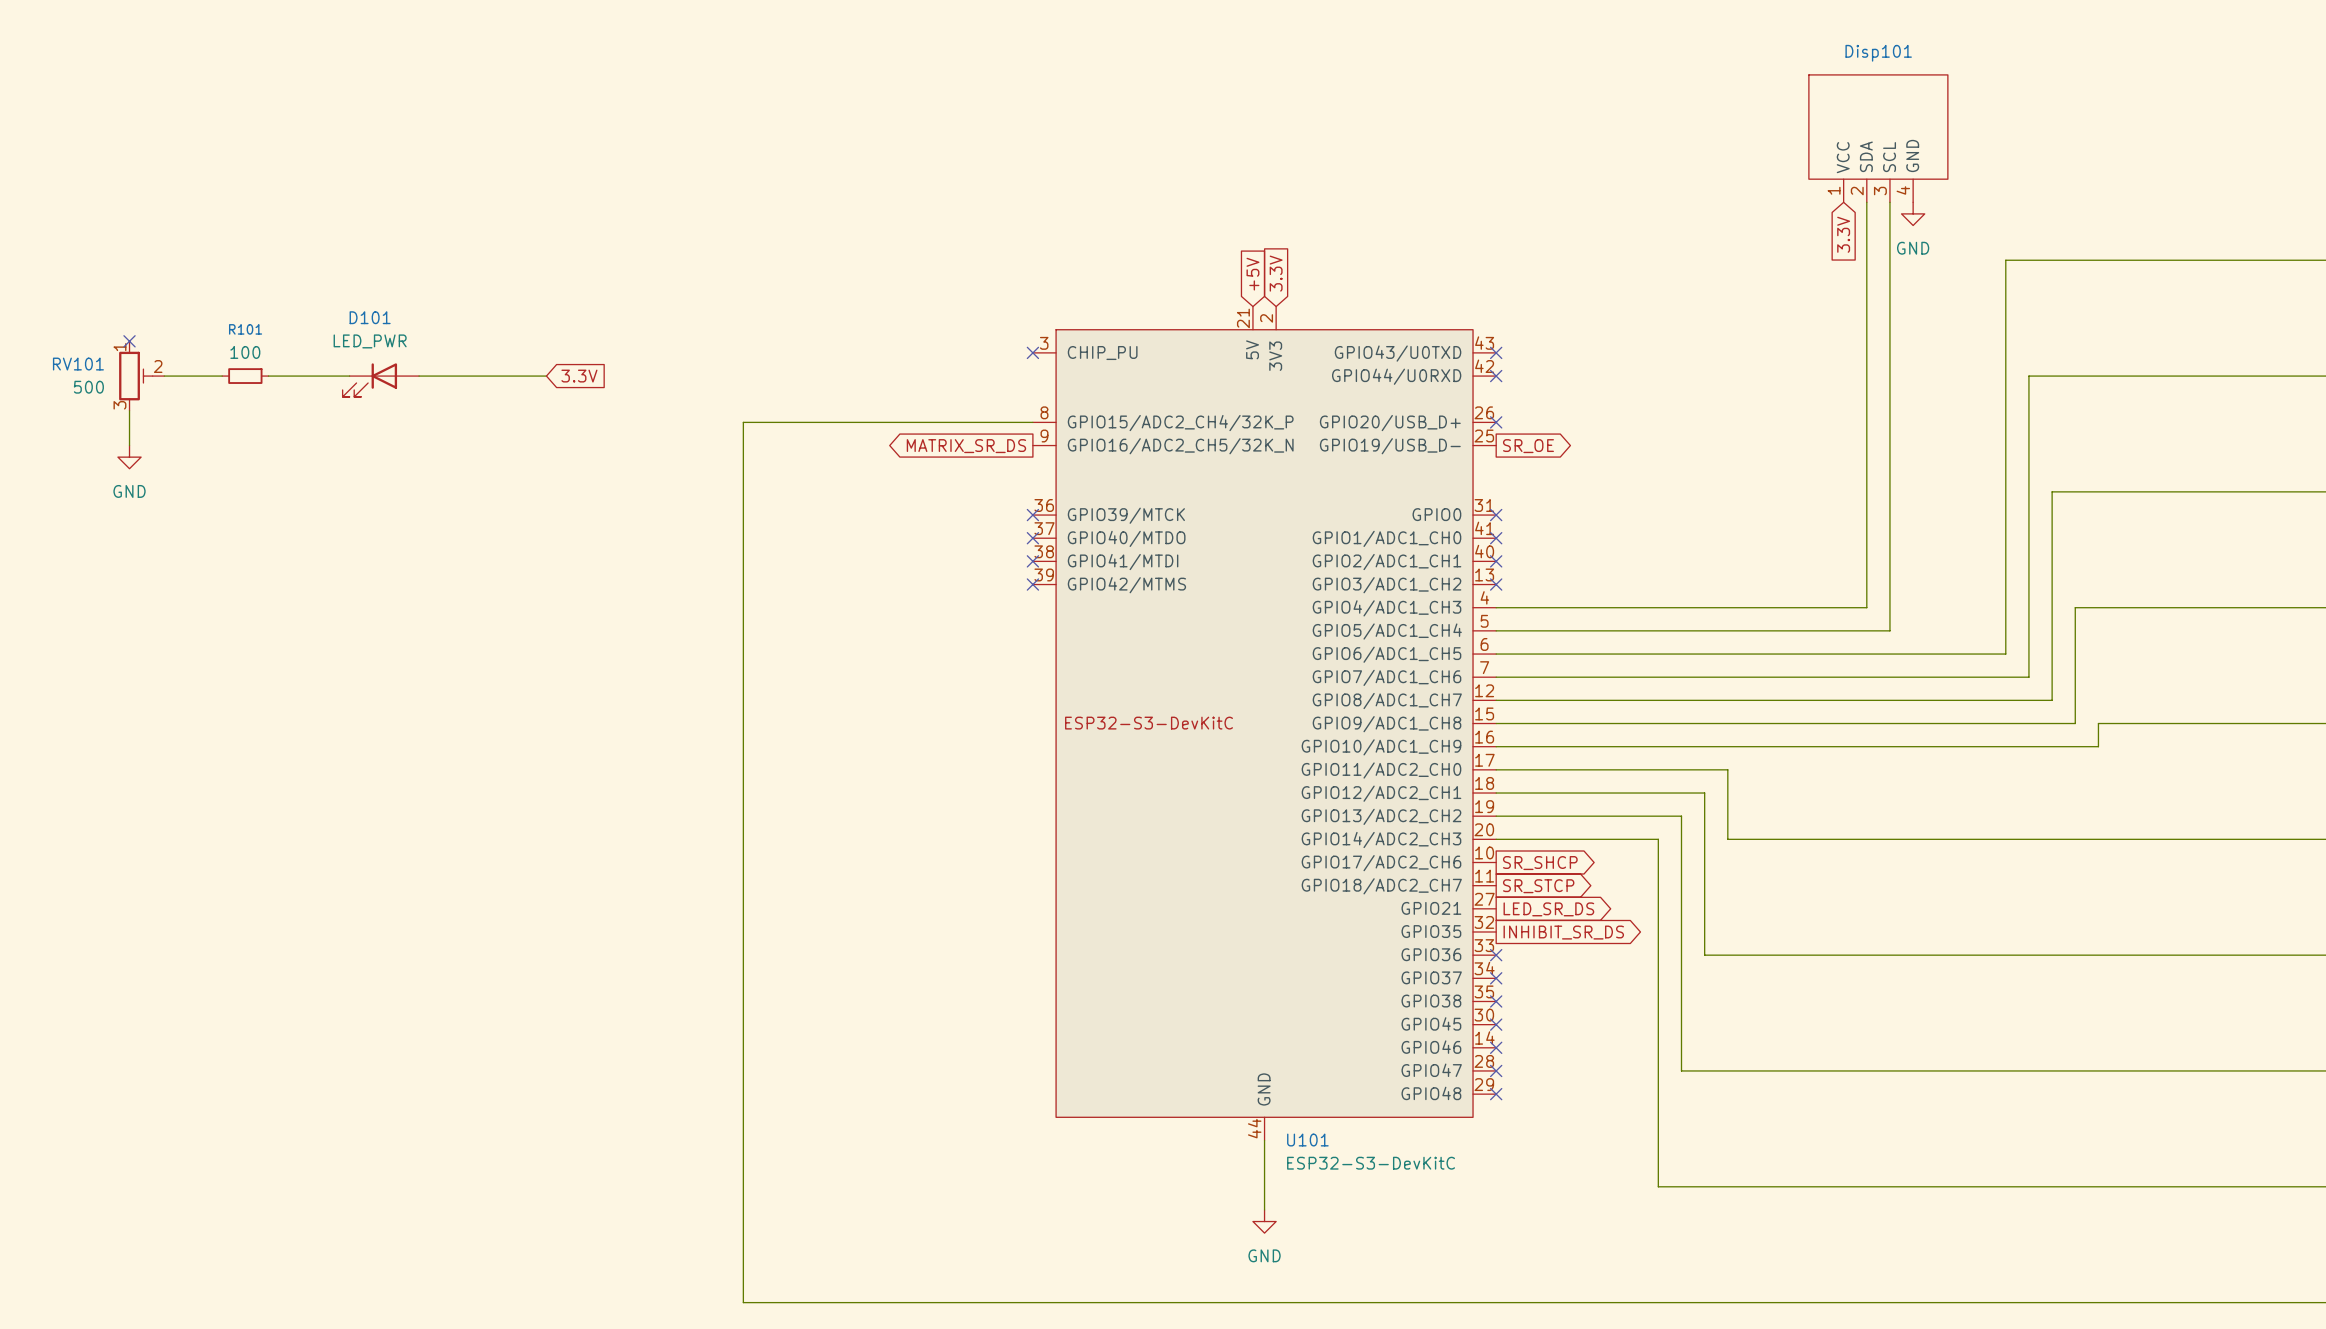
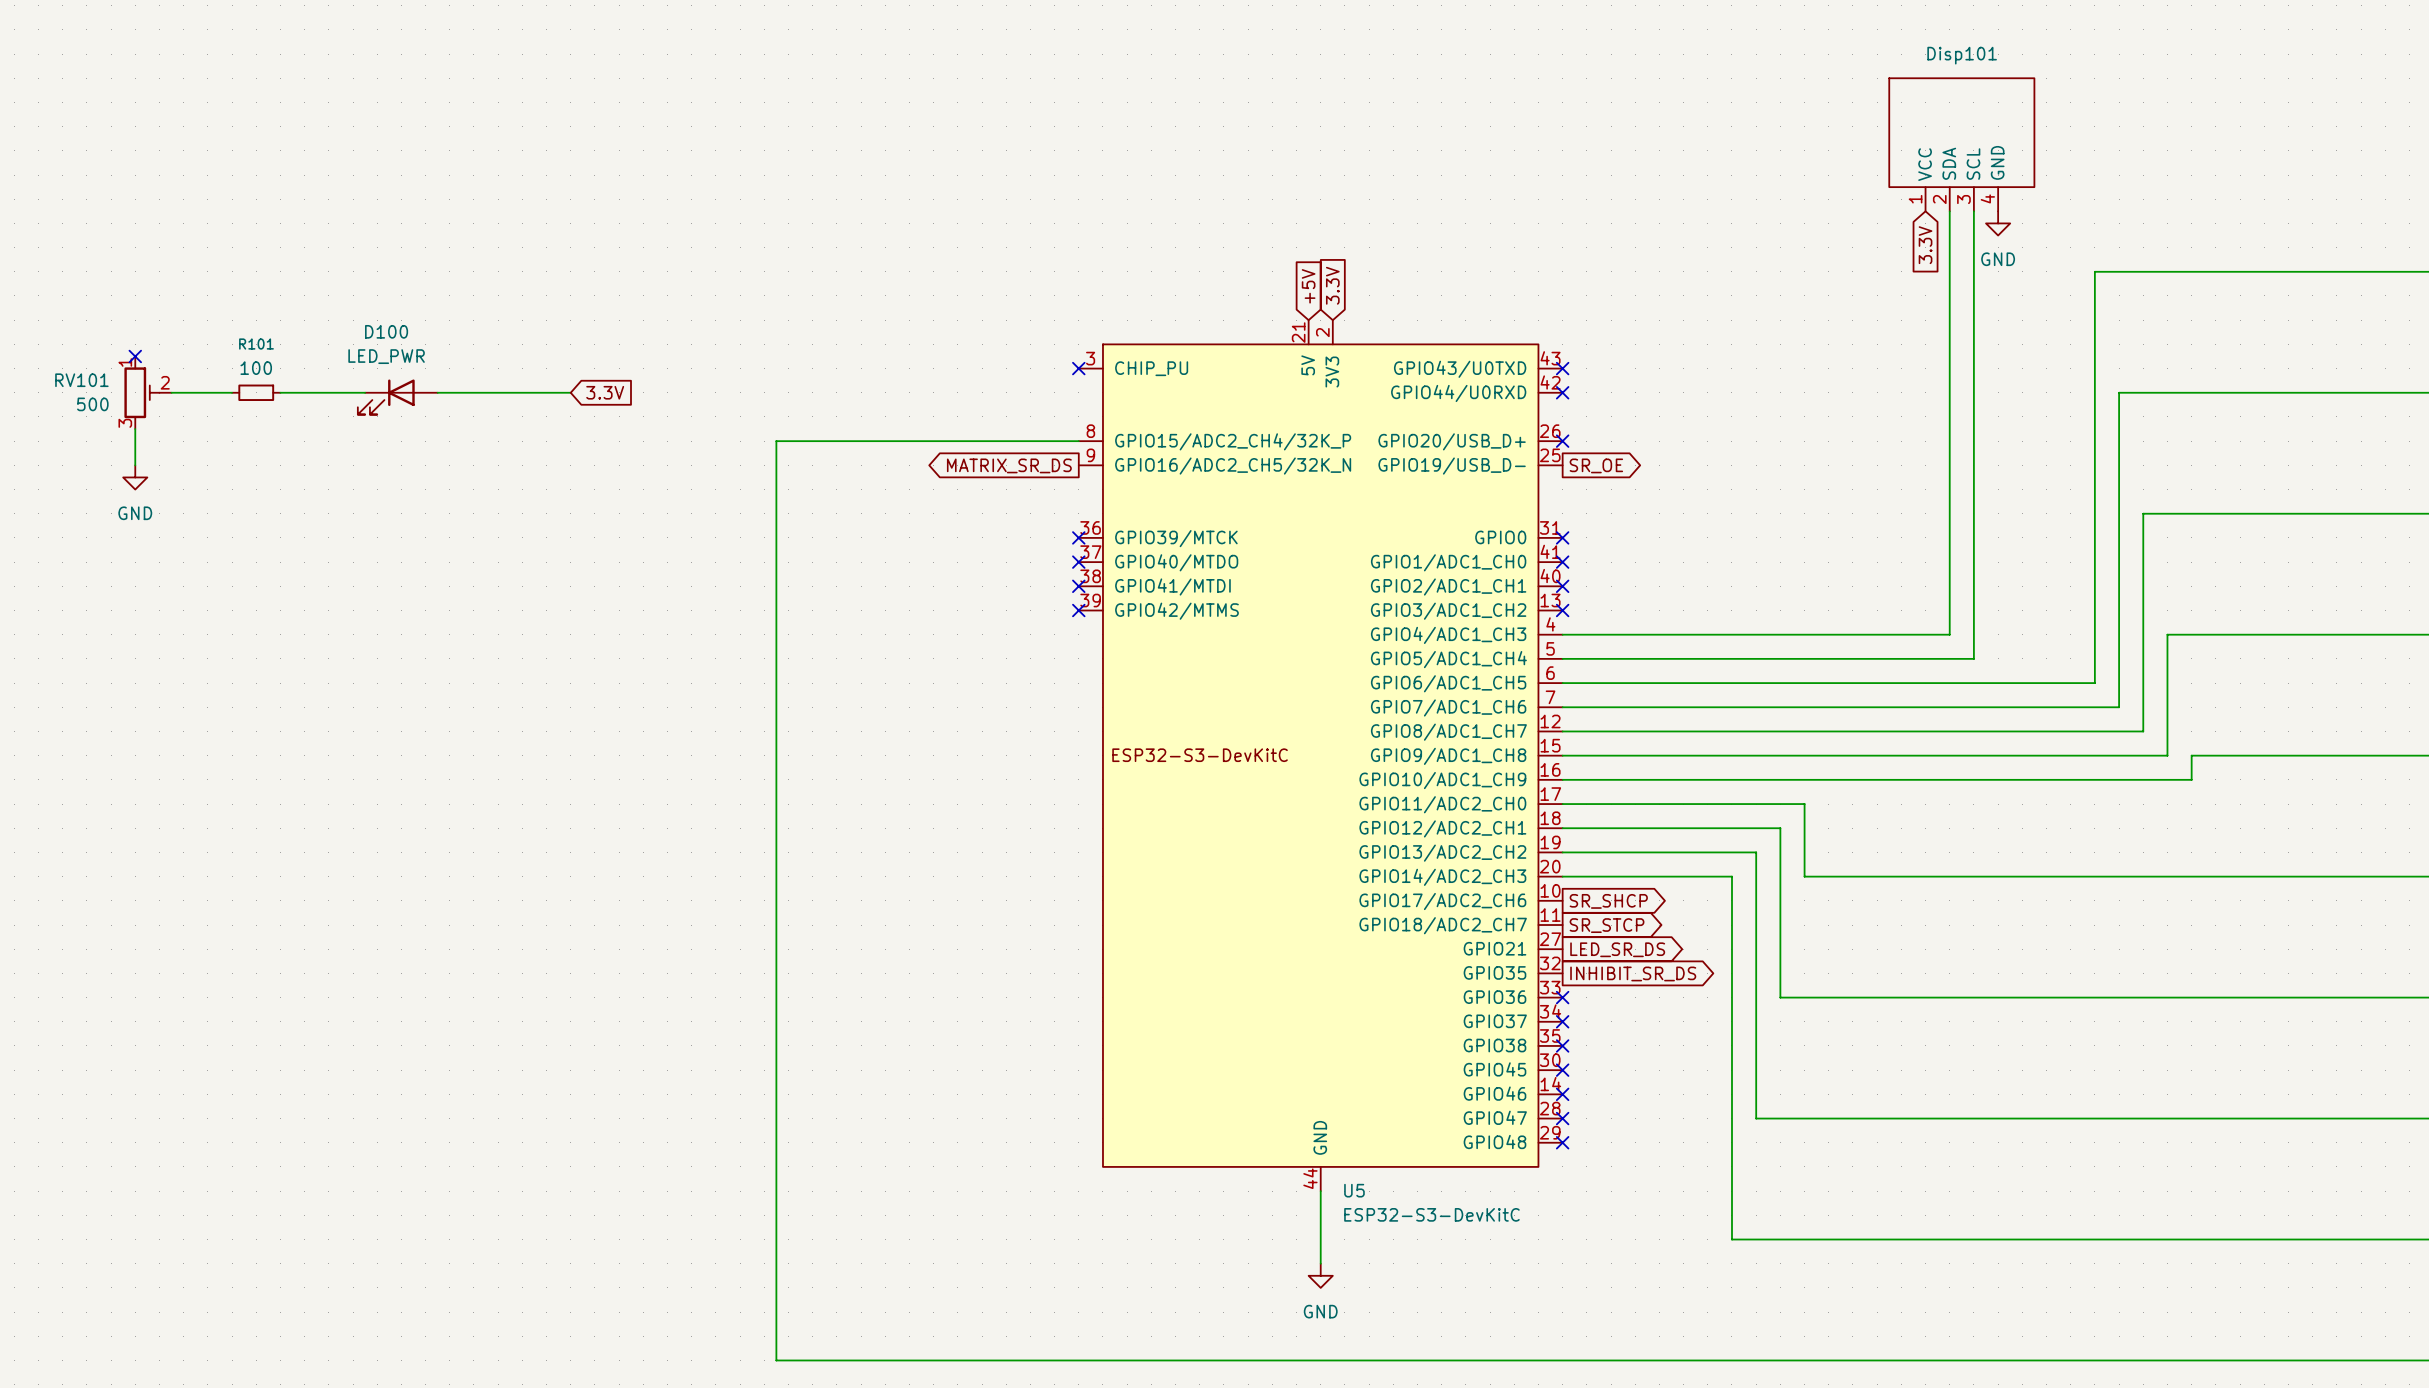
D101 name: D101 (370, 317) -> D100 (386, 331)
U101 name: U101 (1307, 1140) -> U5 (1354, 1190)

